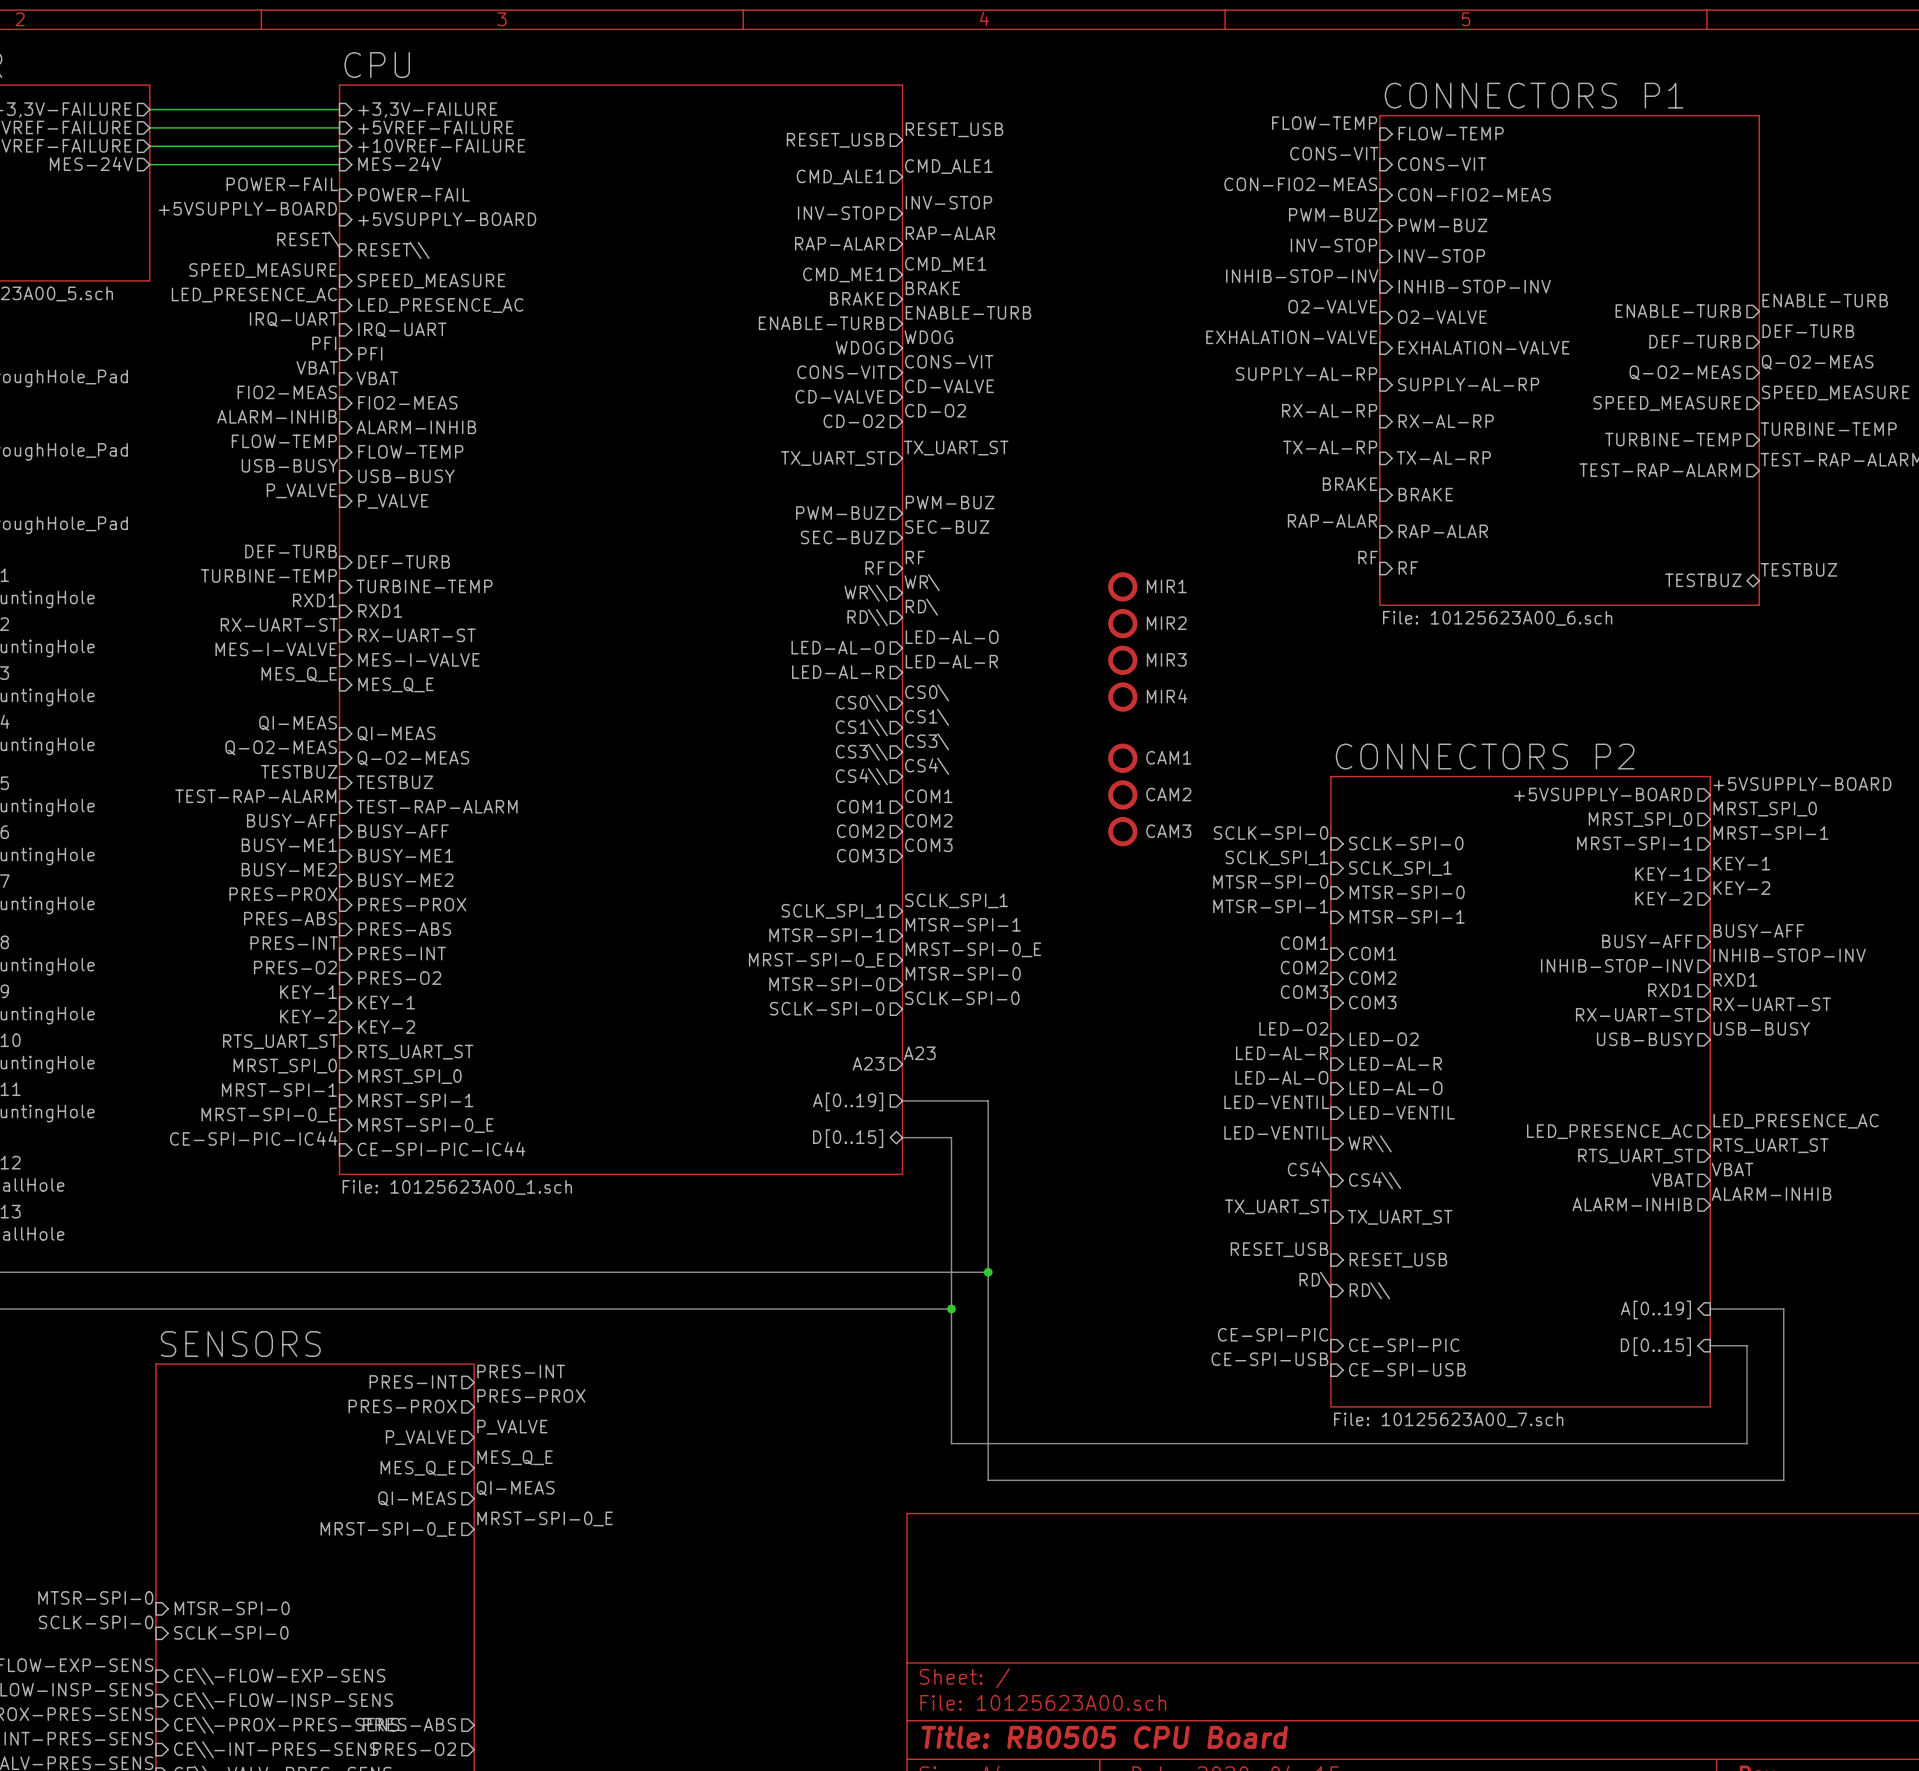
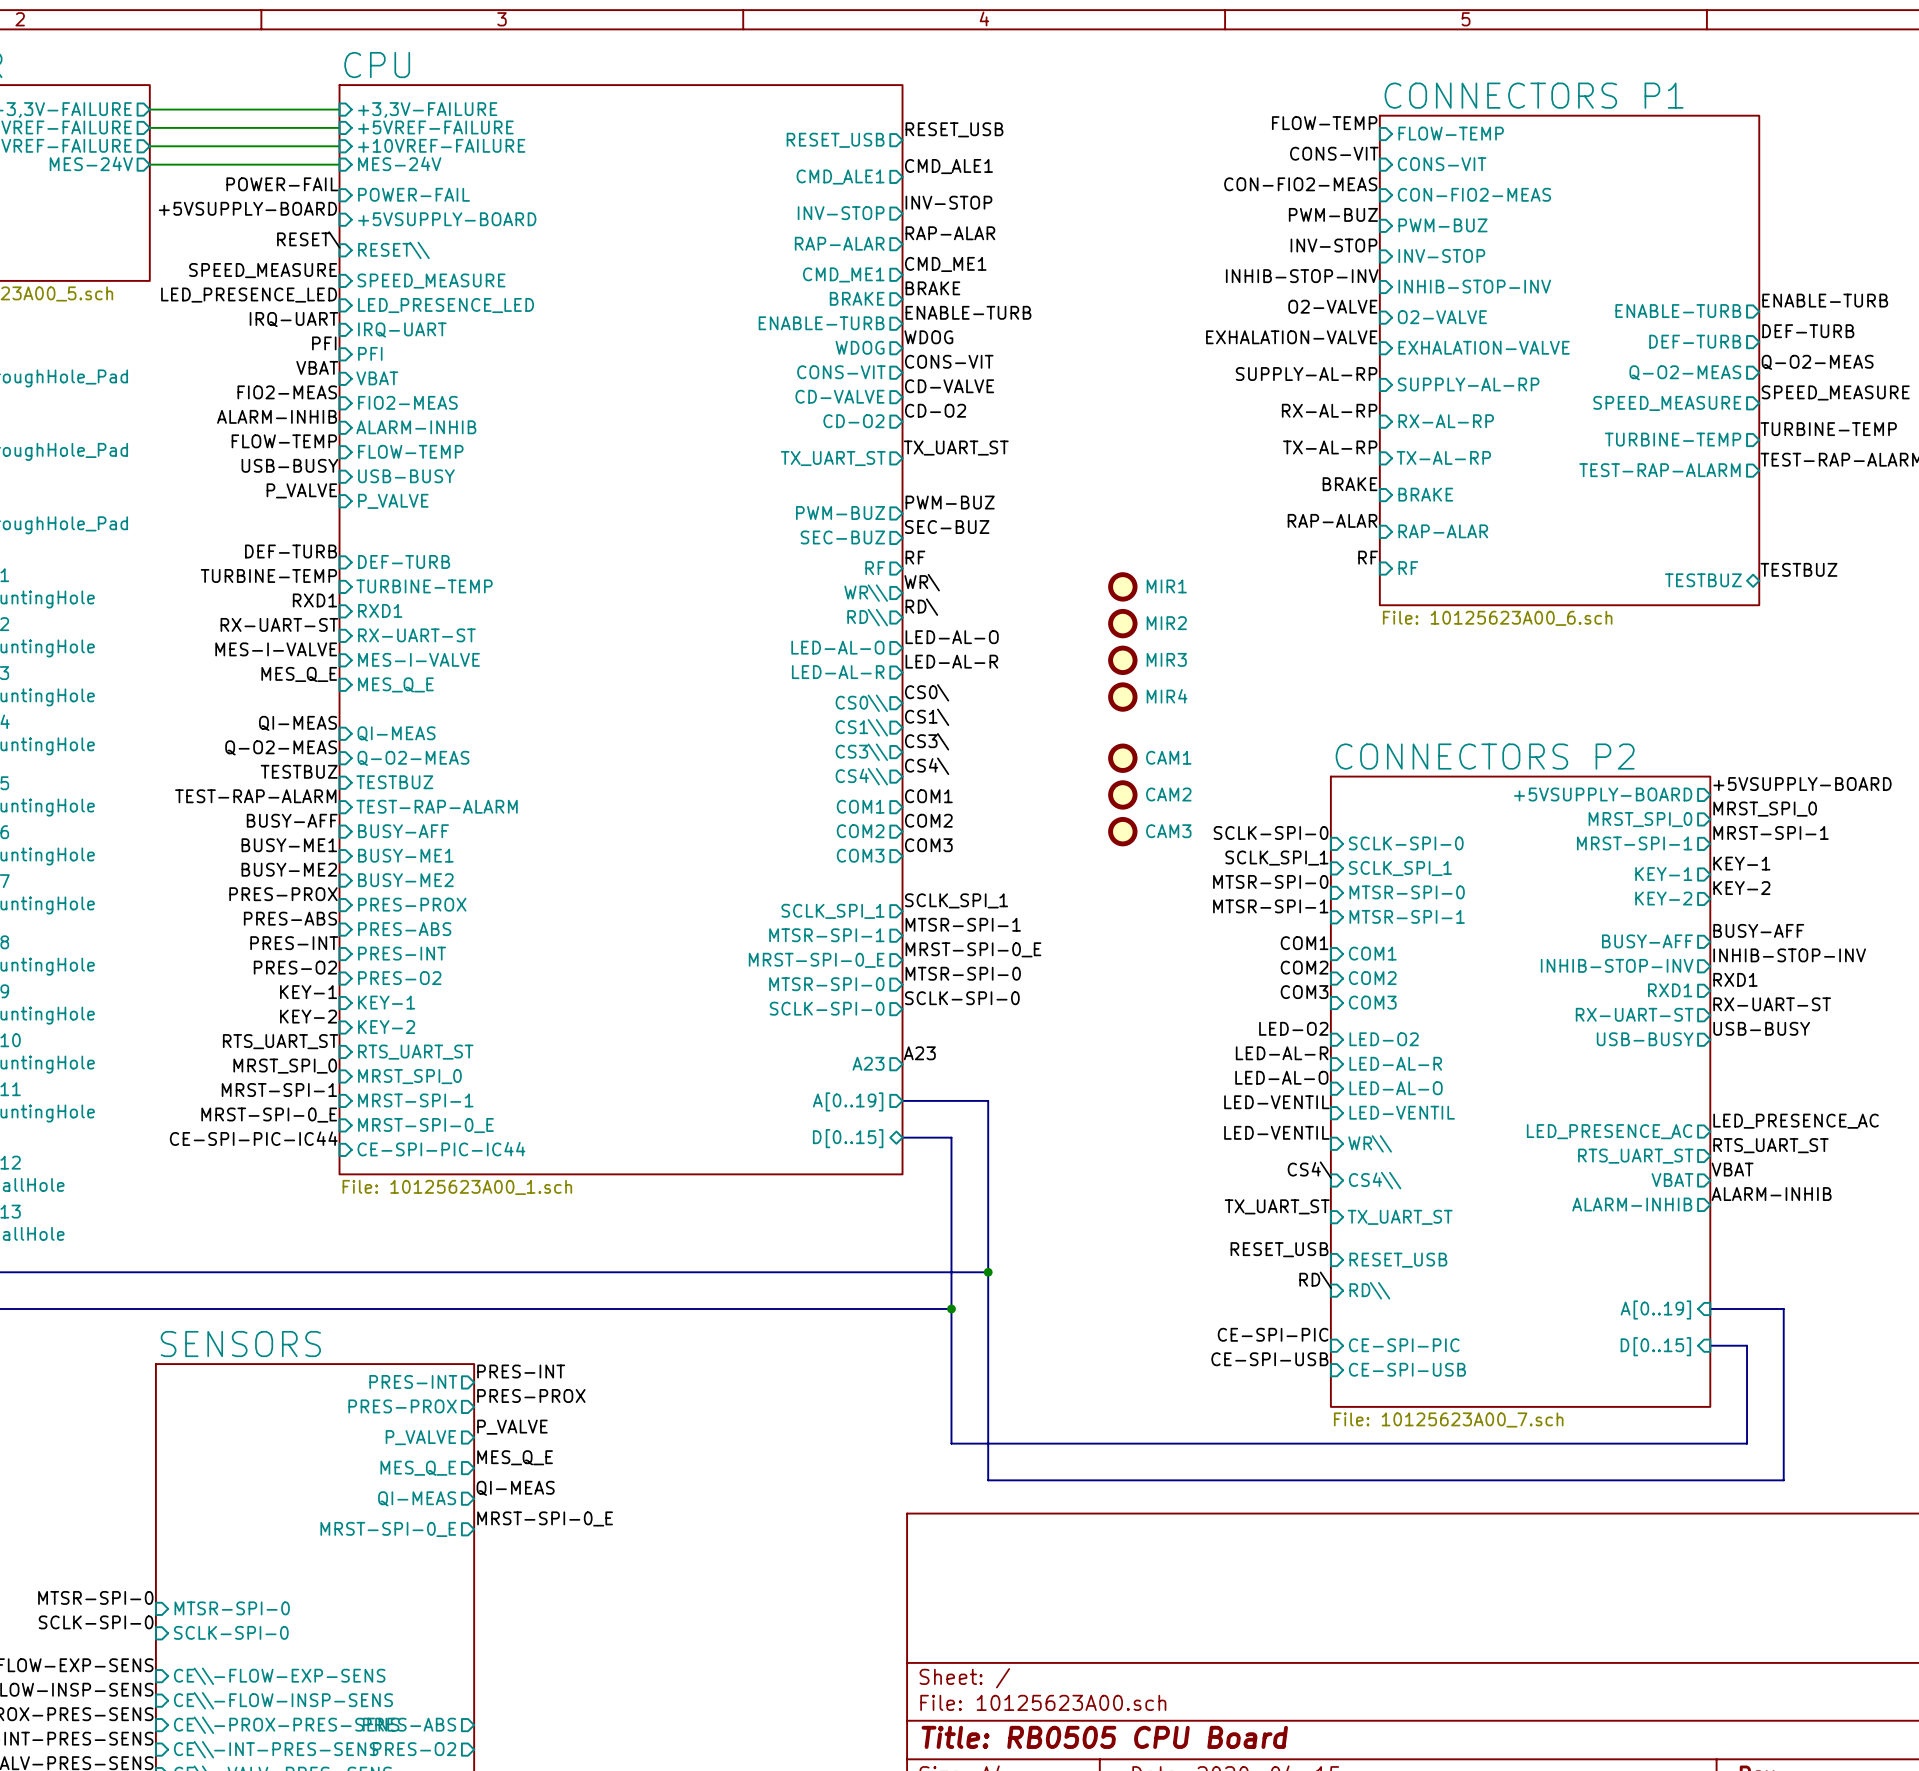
label: LED_PRESENCE_AC (254, 295) -> LED_PRESENCE_LED (249, 295)
sheet pin: LED_PRESENCE_AC (440, 305) -> LED_PRESENCE_LED (446, 305)

